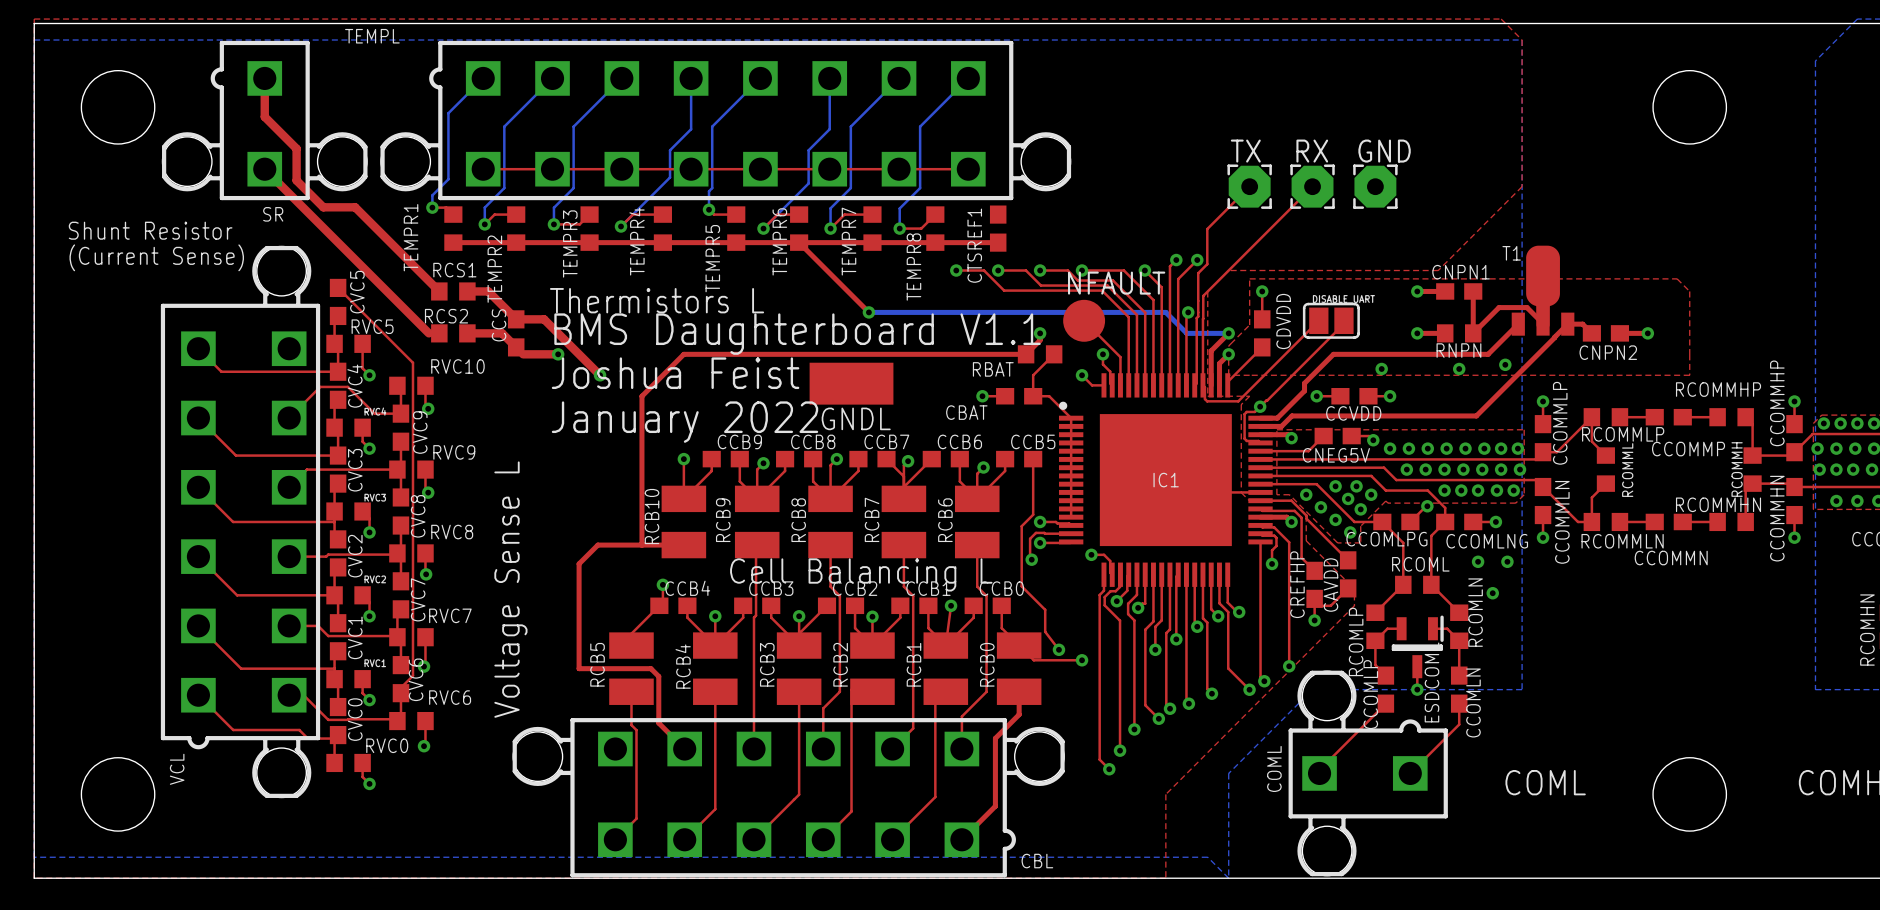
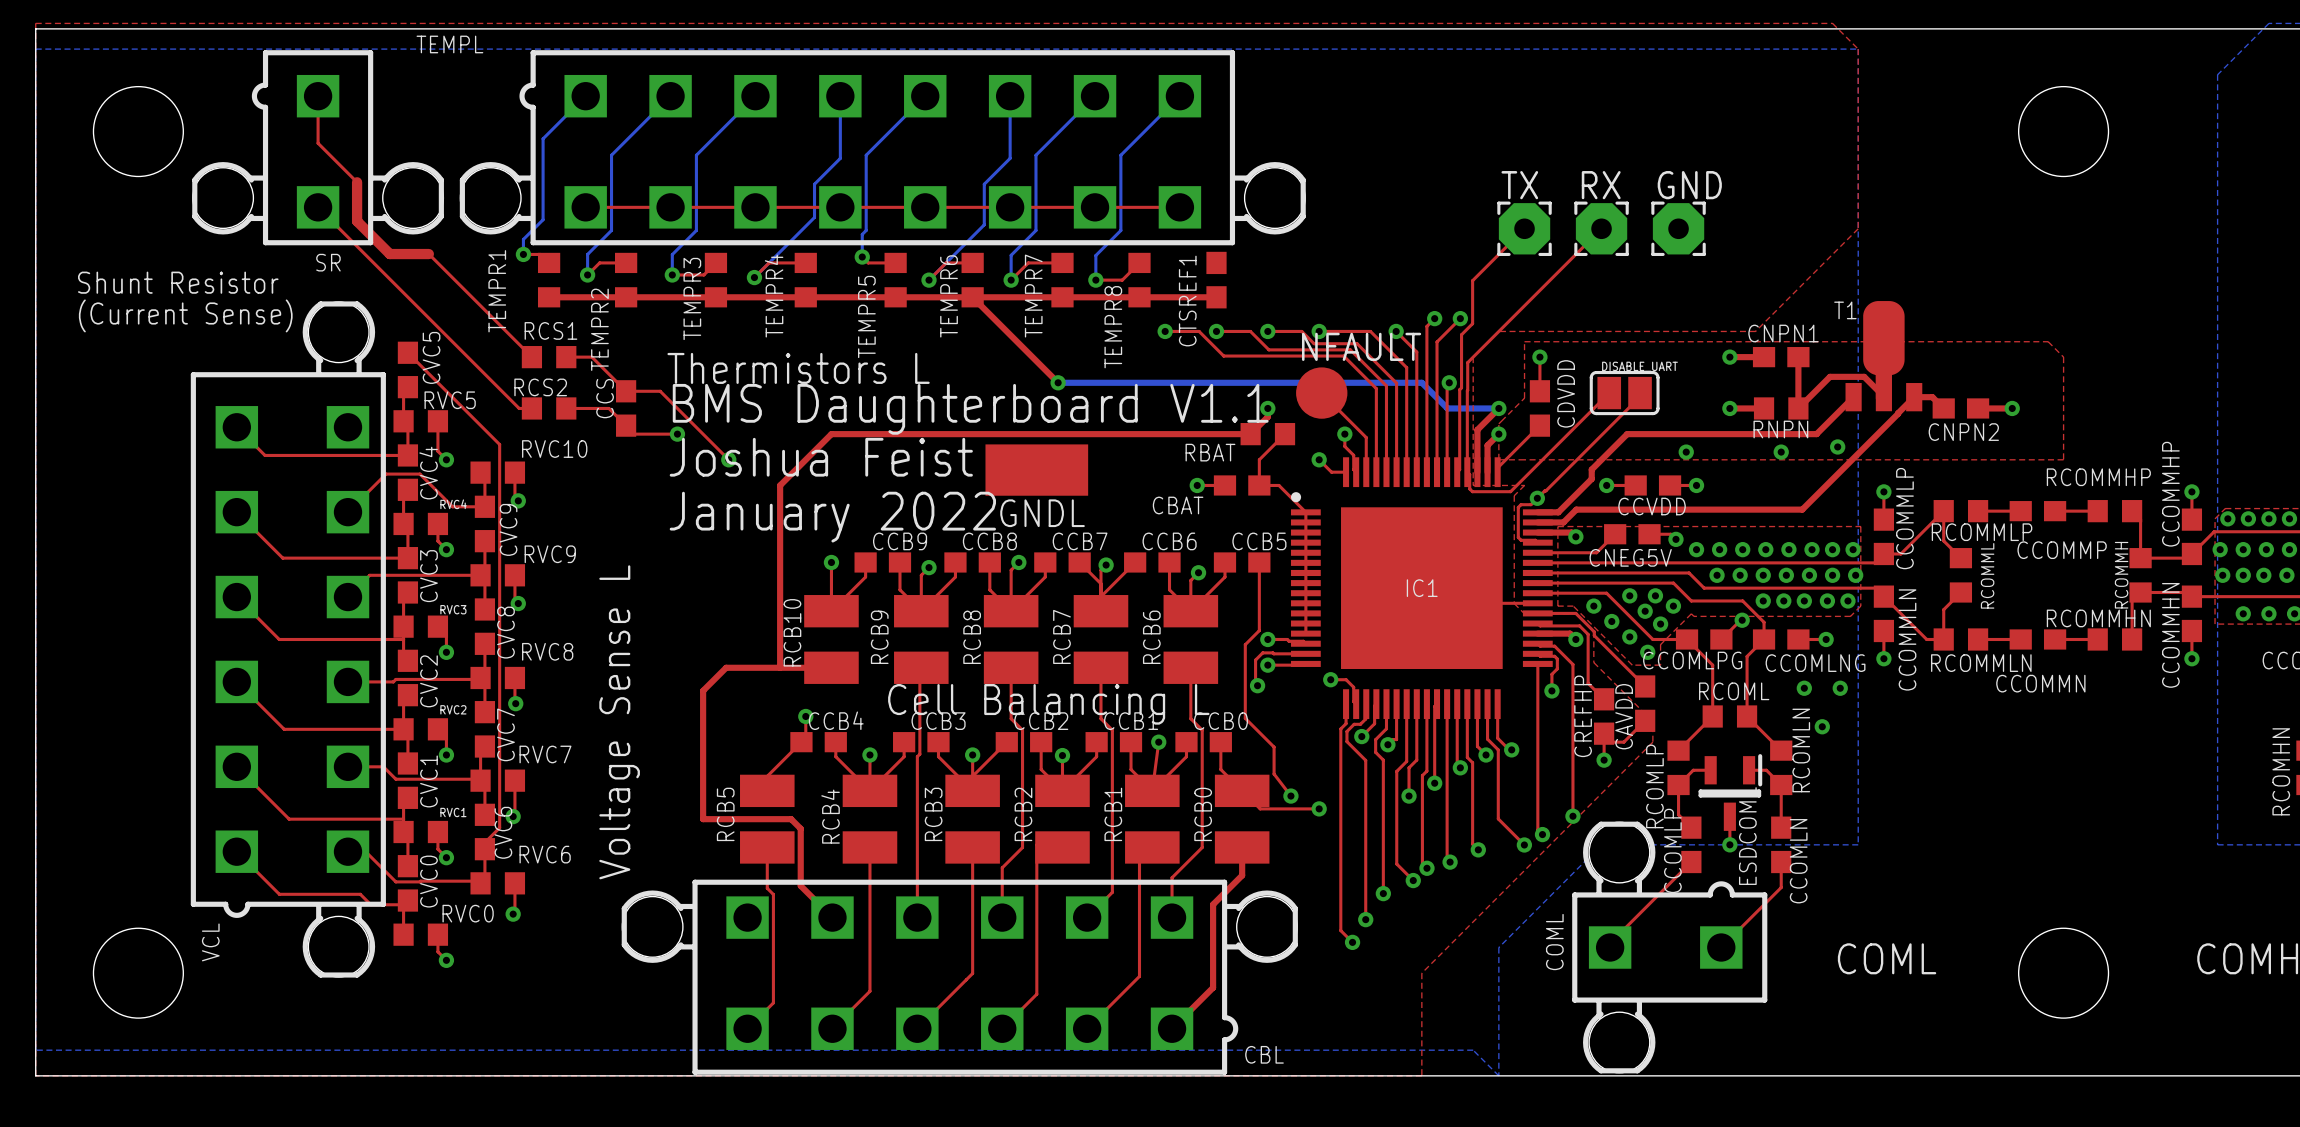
top track width: thick (264, 78) (264, 116) (296, 148) -> thin (318, 96) (318, 143) (357, 182)
top track width: thick (264, 169) (428, 333) -> thin (318, 207) (519, 408)
top track width: thick (355, 207) (439, 291) -> thin (428, 254) (531, 357)
top track width: thick (467, 291) (488, 291) (516, 319) (544, 319) (600, 375) -> thin (566, 357) (591, 357) (626, 391) (660, 391) (728, 459)
top track width: thick (467, 333) (502, 333) (516, 347) -> thin (566, 408) (608, 408) (626, 425)
top track width: thick (523, 354) (558, 354) -> thin (634, 434) (677, 434)

